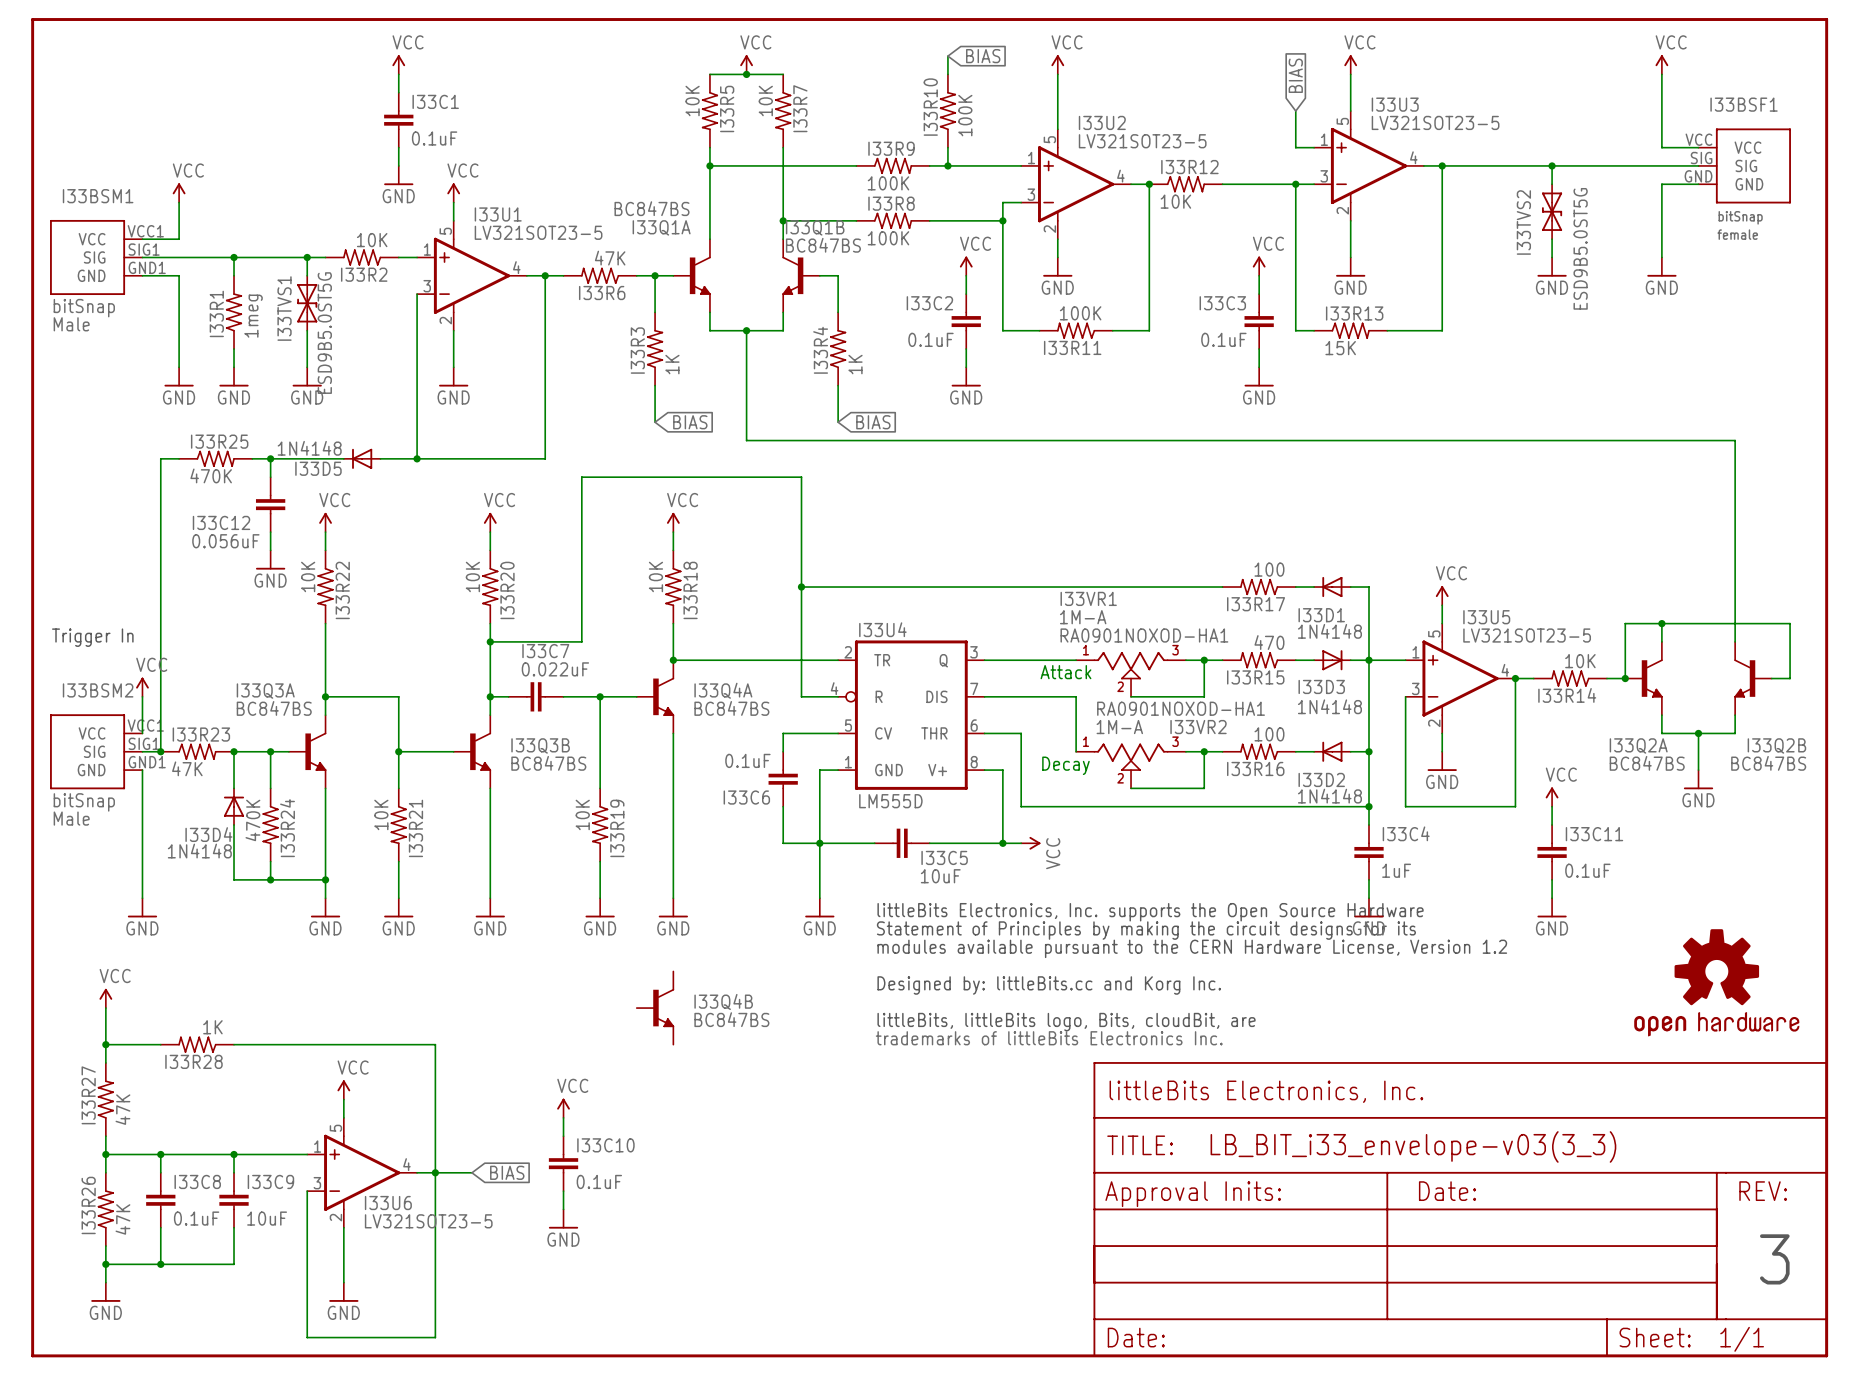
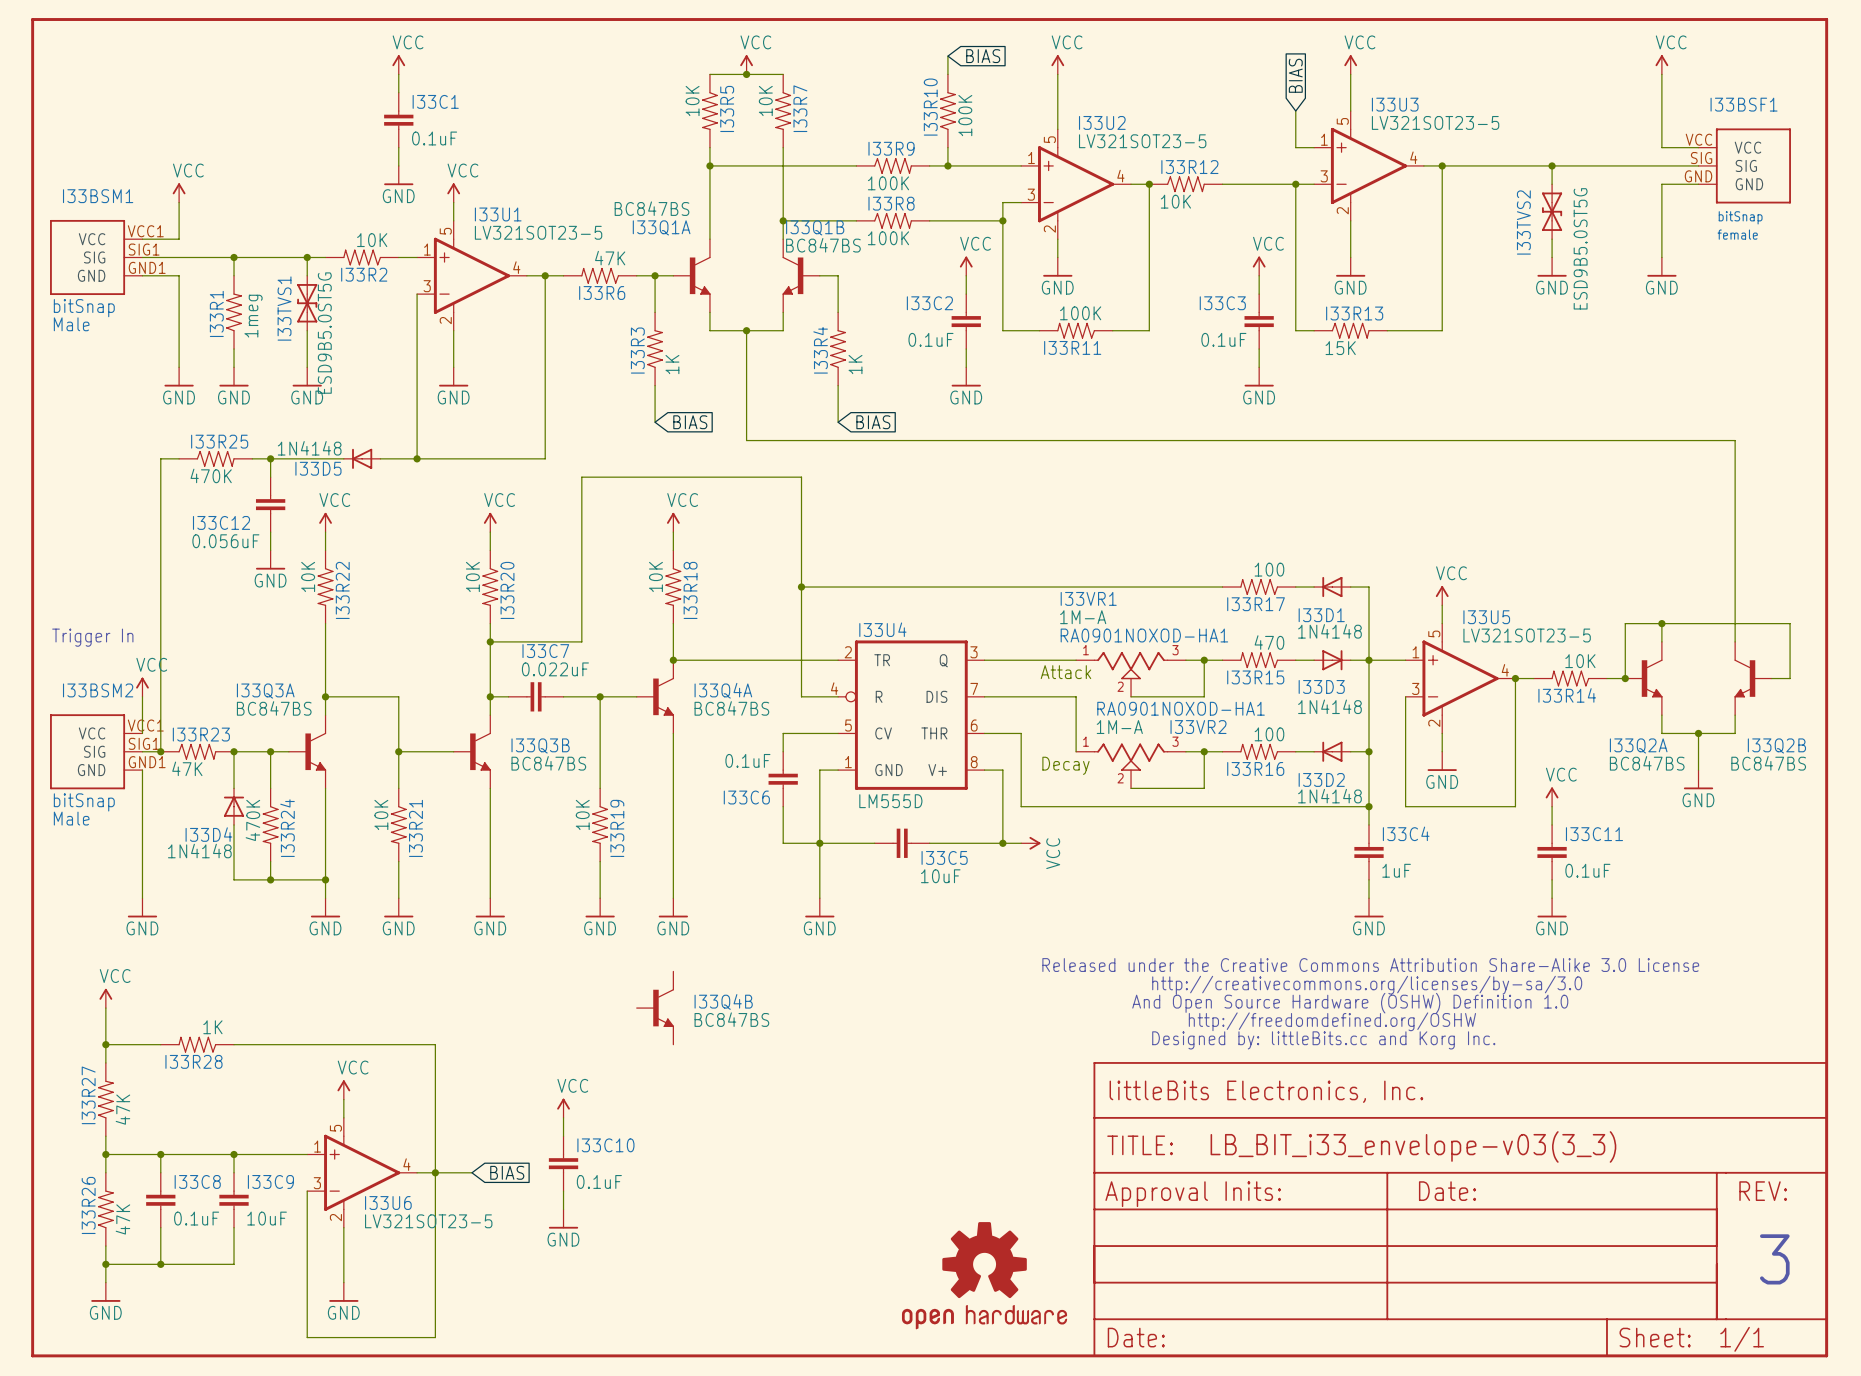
part: (1191, 974) -> none
part: (1716, 982) -> none
part: none -> (1370, 1003)
part: none -> (984, 1275)

